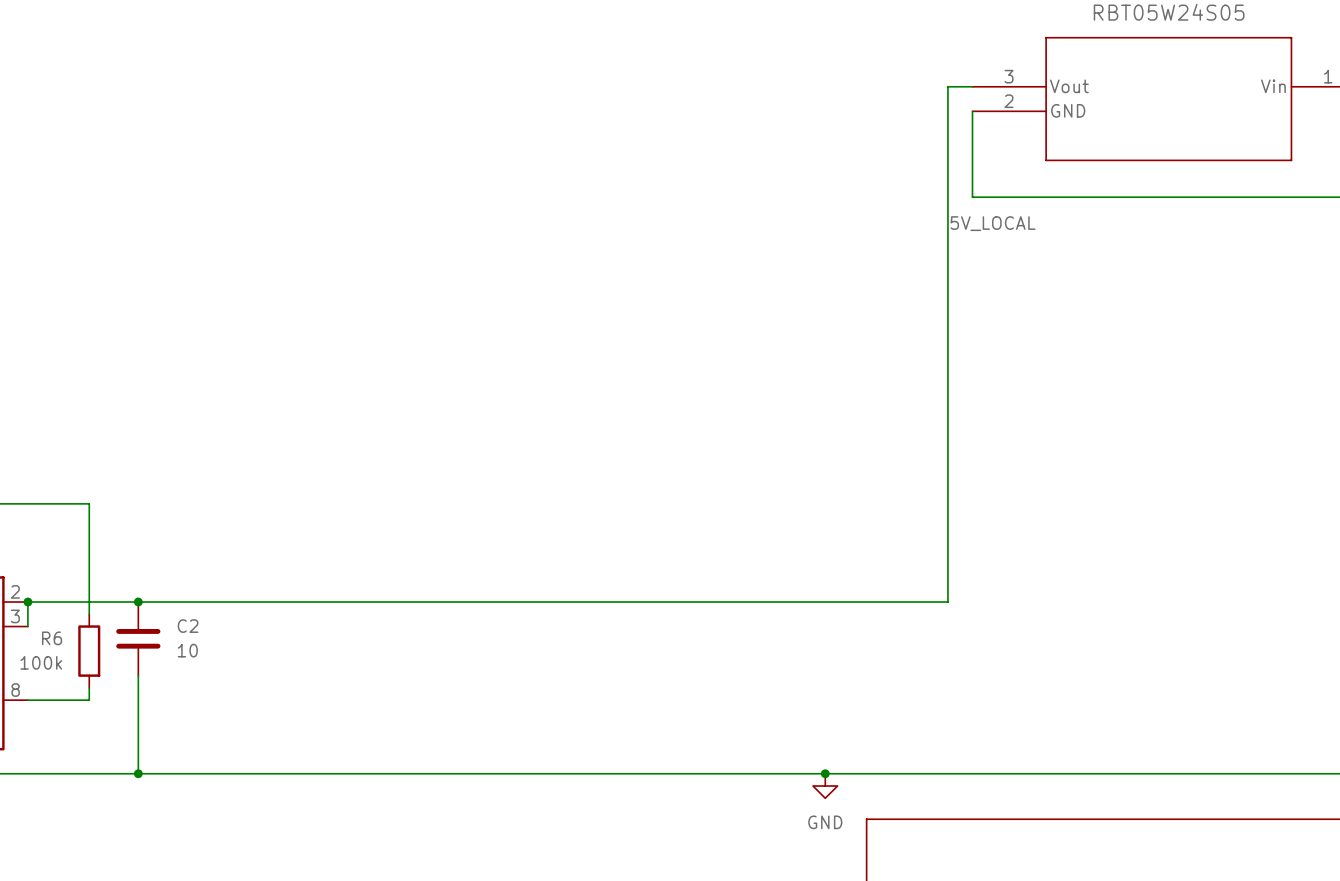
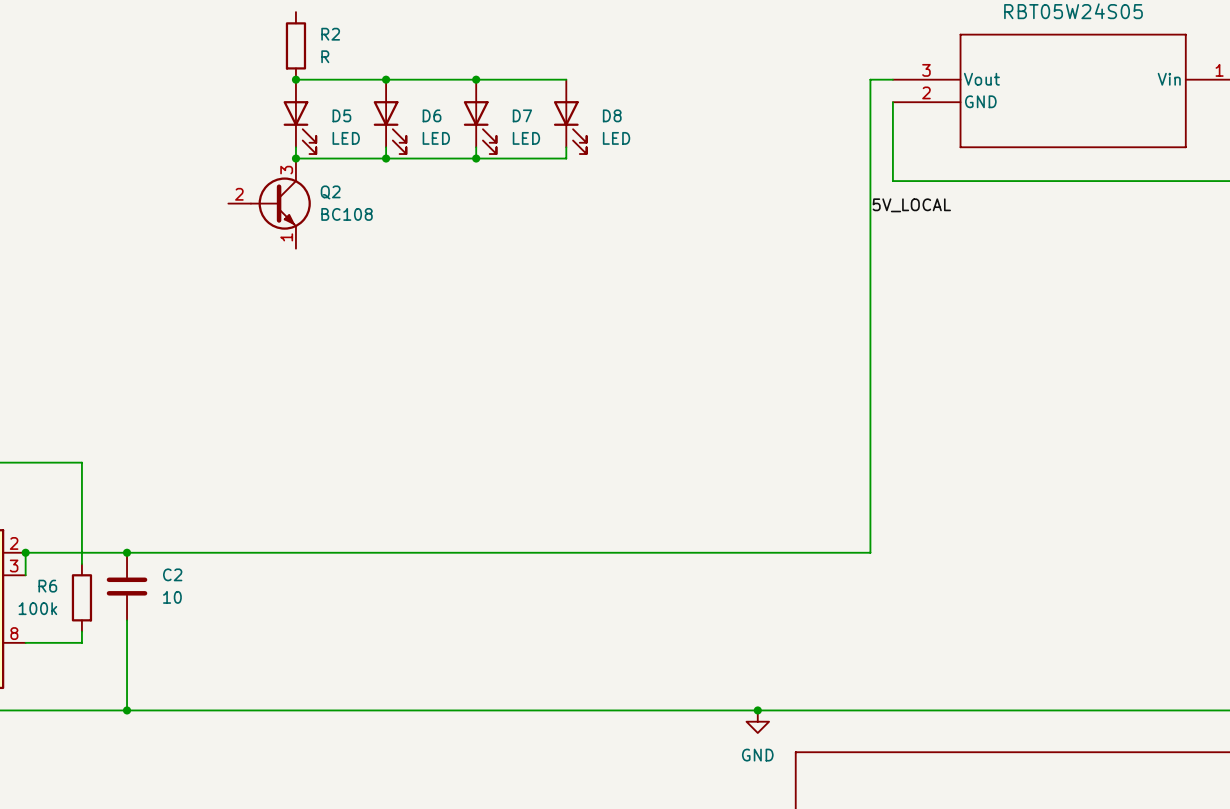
R2: none -> R (295, 45)
wire: none -> (295, 79) (566, 79)
junction: none -> (295, 79)
junction: none -> (386, 79)
junction: none -> (476, 79)
D5: none -> LED (299, 116)
D6: none -> LED (390, 116)
D7: none -> LED (480, 116)
D8: none -> LED (570, 116)
wire: none -> (295, 147) (295, 158) (566, 158) (566, 147)
wire: none -> (386, 147) (386, 158)
wire: none -> (476, 147) (476, 158)
junction: none -> (295, 158)
junction: none -> (386, 158)
junction: none -> (476, 158)
Q2: none -> BC108 (269, 203)

